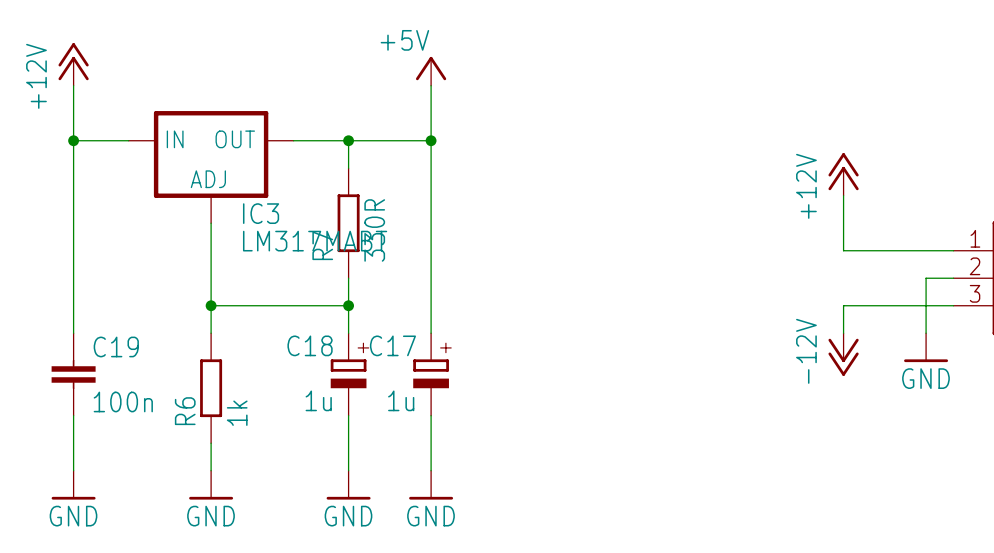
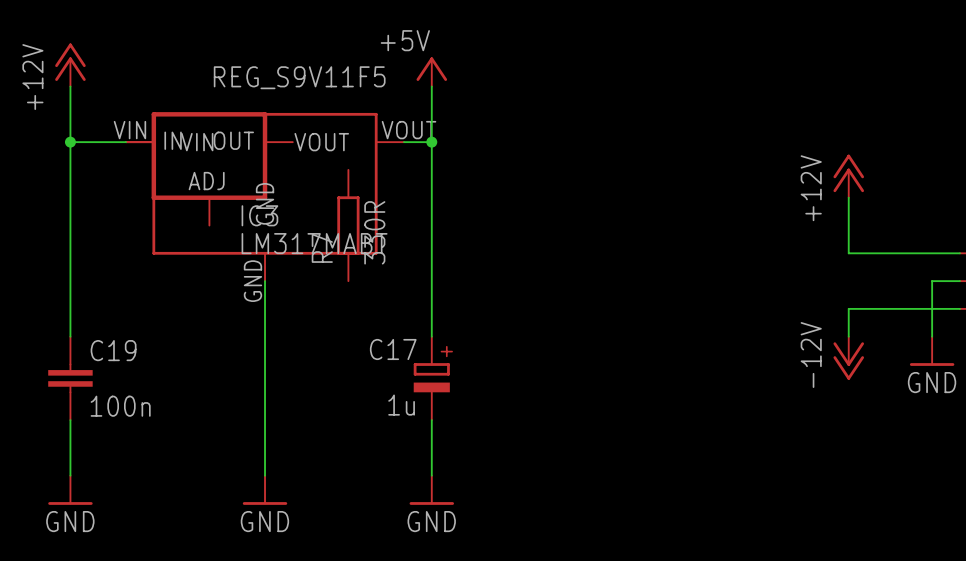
wire: (293, 140) (403, 140) -> none
wire: (348, 140) (348, 168) -> none
junction: (348, 140) -> none
part: none -> REG_S9V11F5 (265, 197)
wire: (211, 223) (211, 333) -> none
wire: none -> (265, 281) (265, 475)
wire: (348, 278) (348, 333) -> none
wire: (211, 305) (348, 305) -> none
junction: (211, 305) -> none
junction: (348, 305) -> none
C18: 1u (348, 374) -> none
R6: 1k (211, 388) -> none
wire: (348, 415) (348, 470) -> none
wire: (211, 443) (211, 470) -> none
power symbol: GND (211, 485) -> none
power symbol: none -> GND (265, 490)
power symbol: GND (348, 485) -> none

